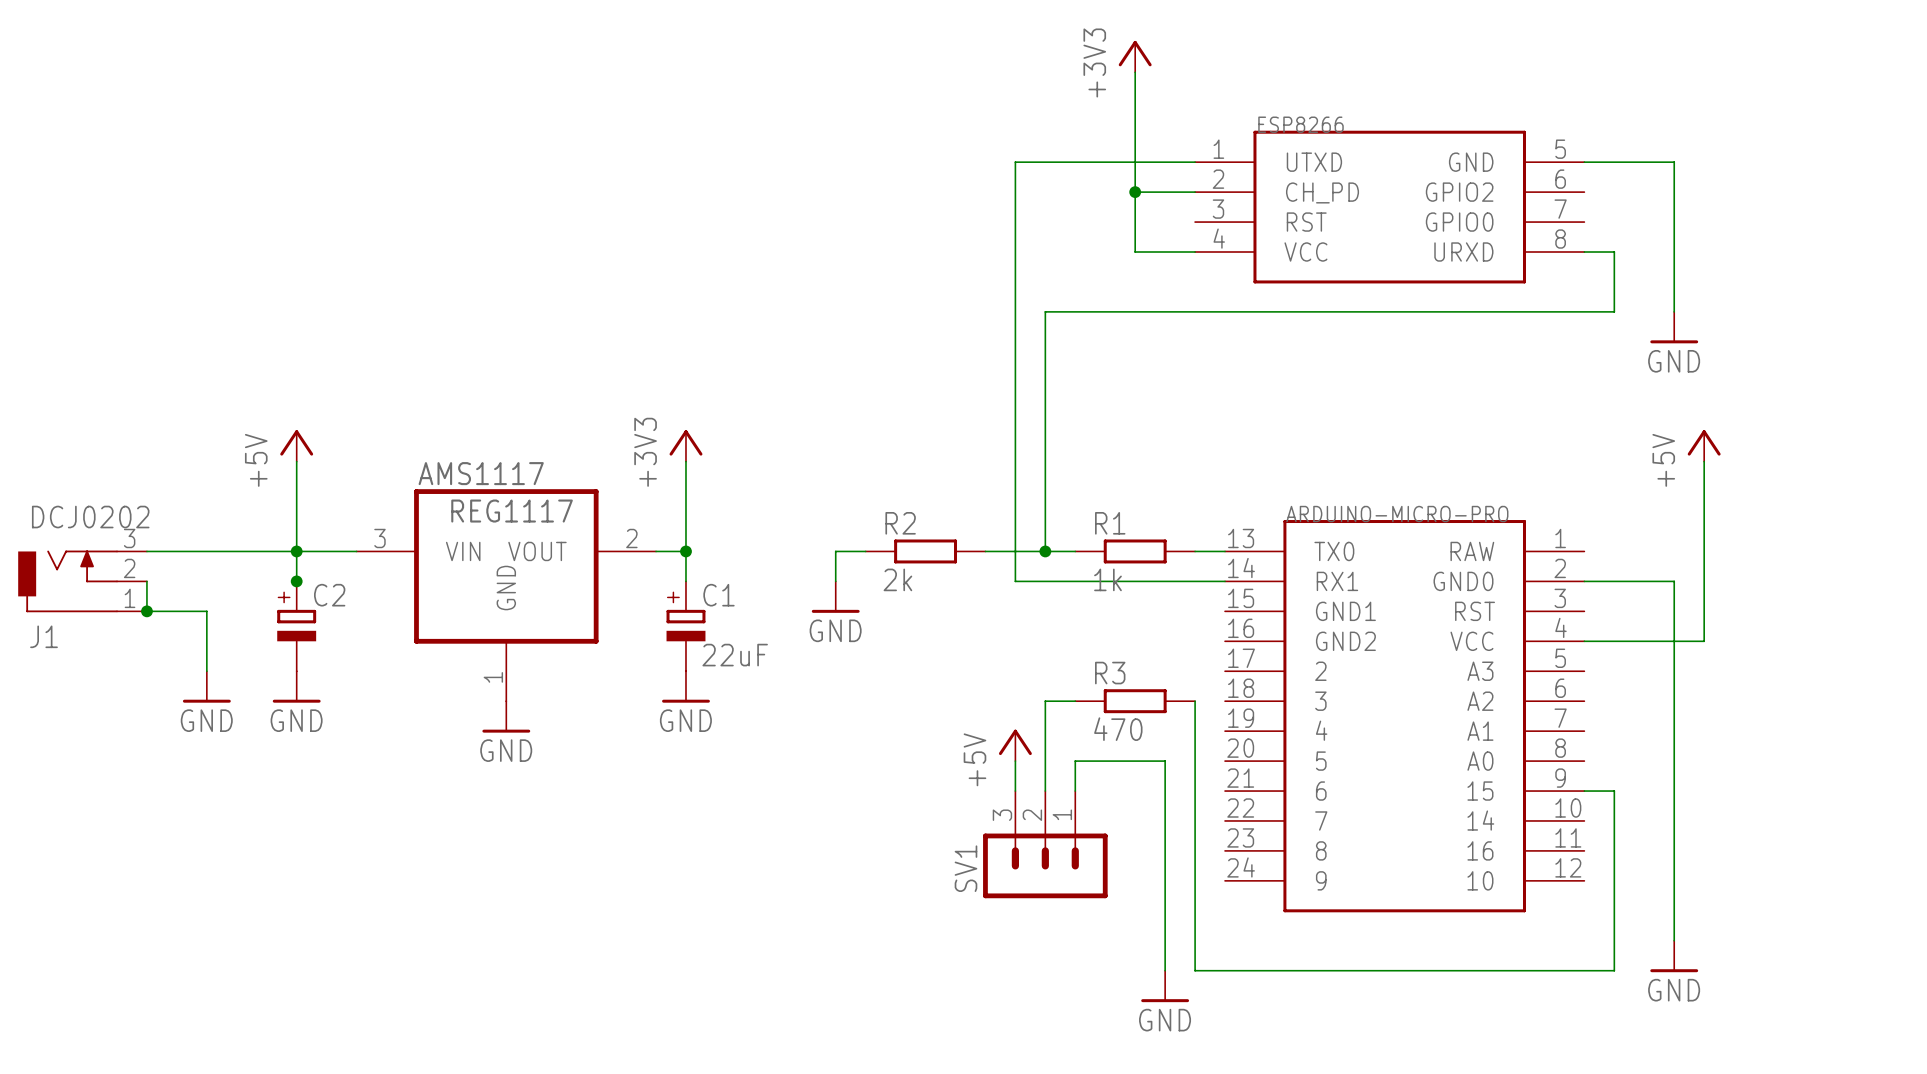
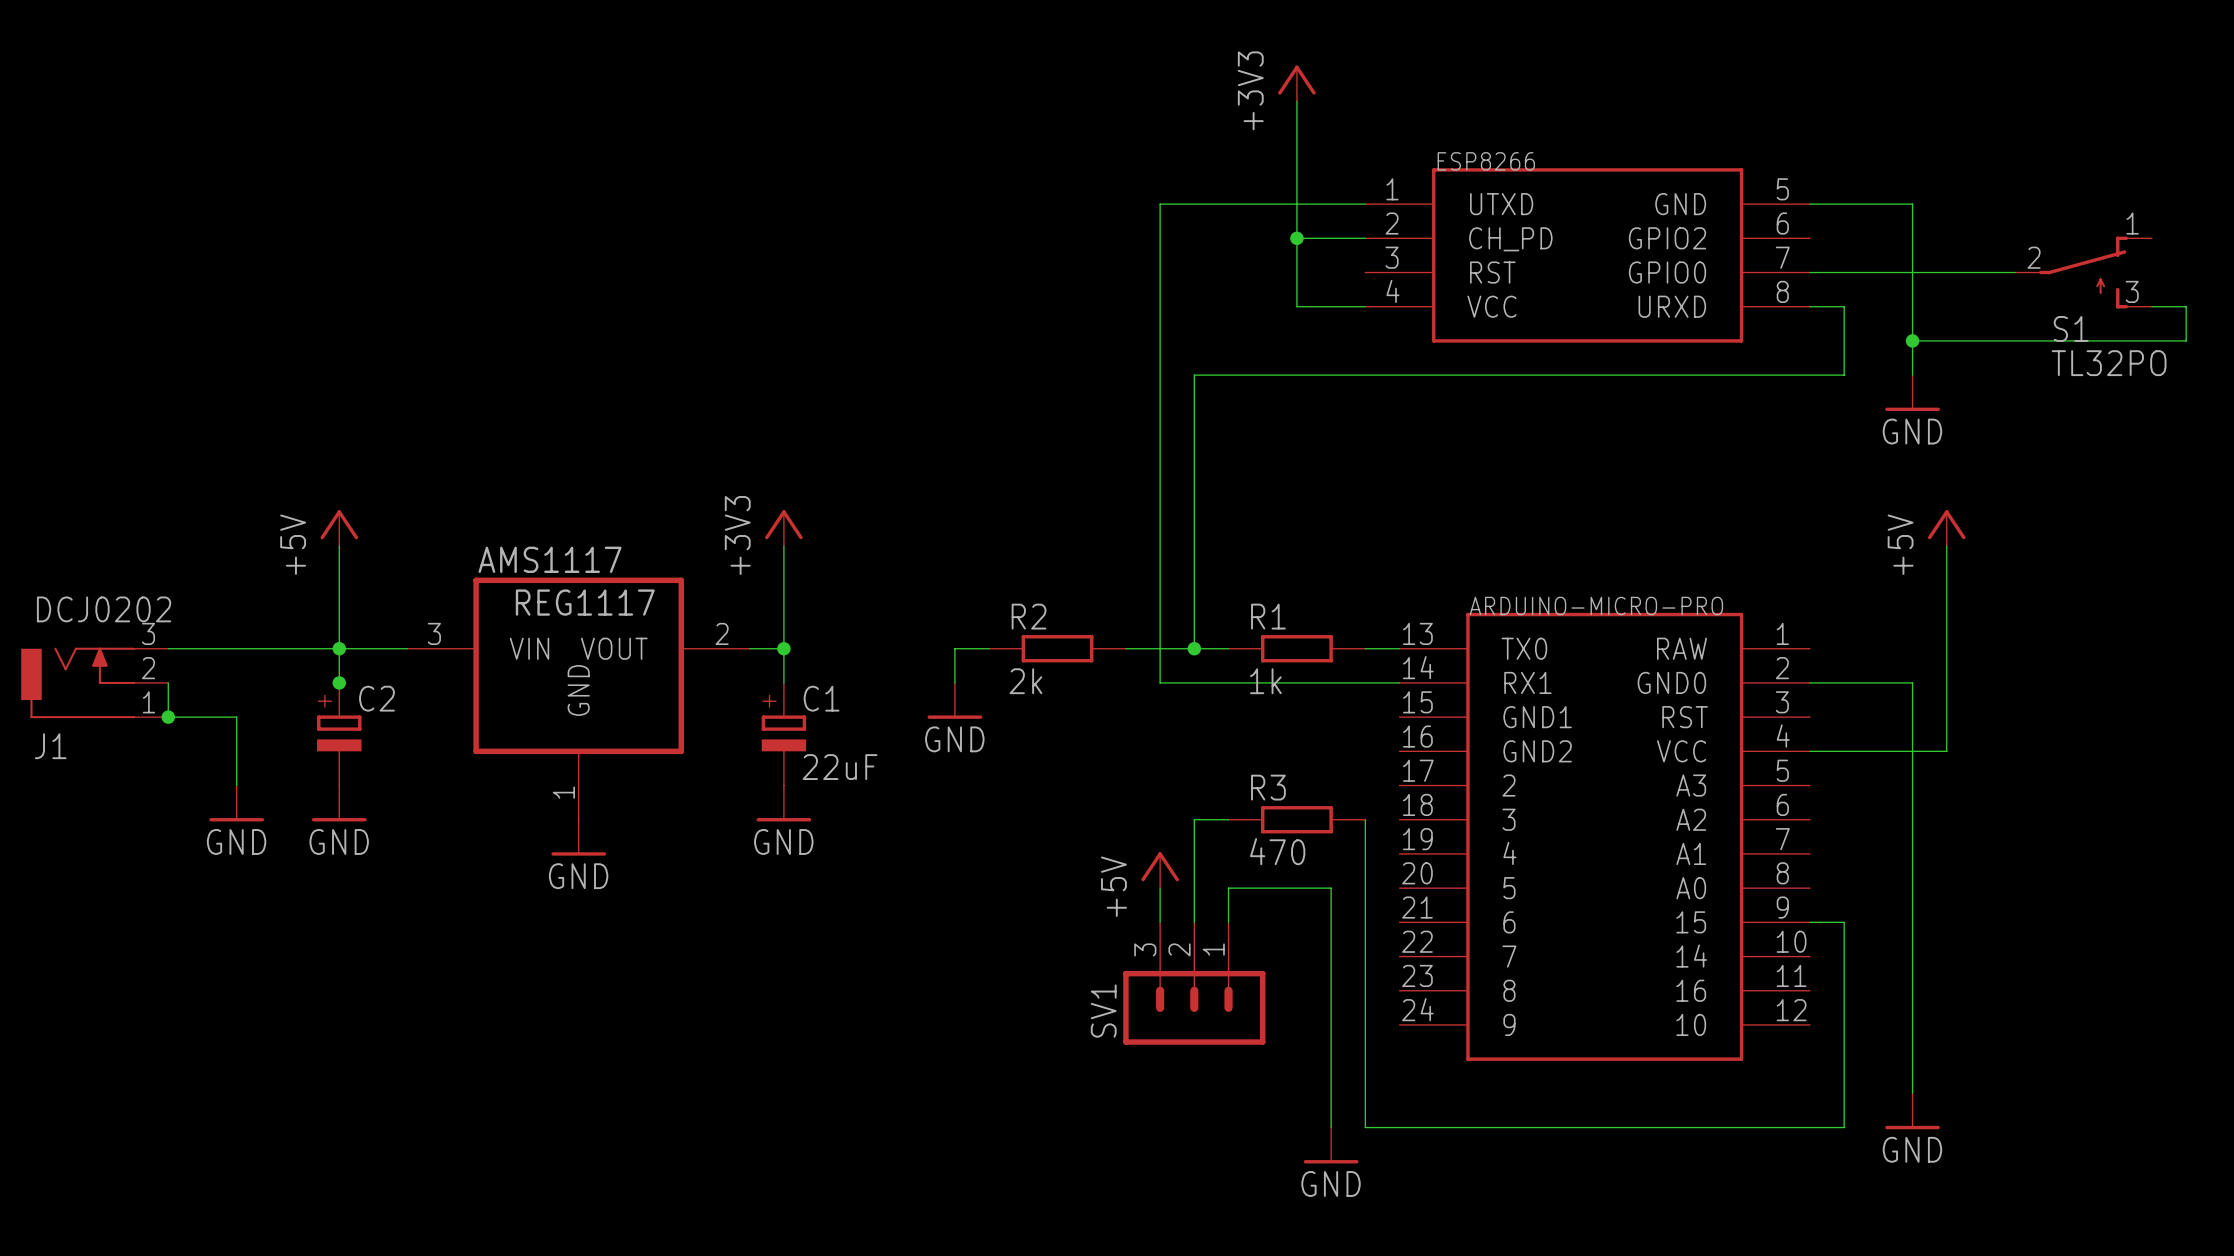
wire: none -> (1809, 272) (2015, 272)
S1: none -> TL32PO (2083, 272)
wire: none -> (2151, 306) (2186, 306) (2186, 340) (1912, 340)
junction: none -> (1912, 340)

